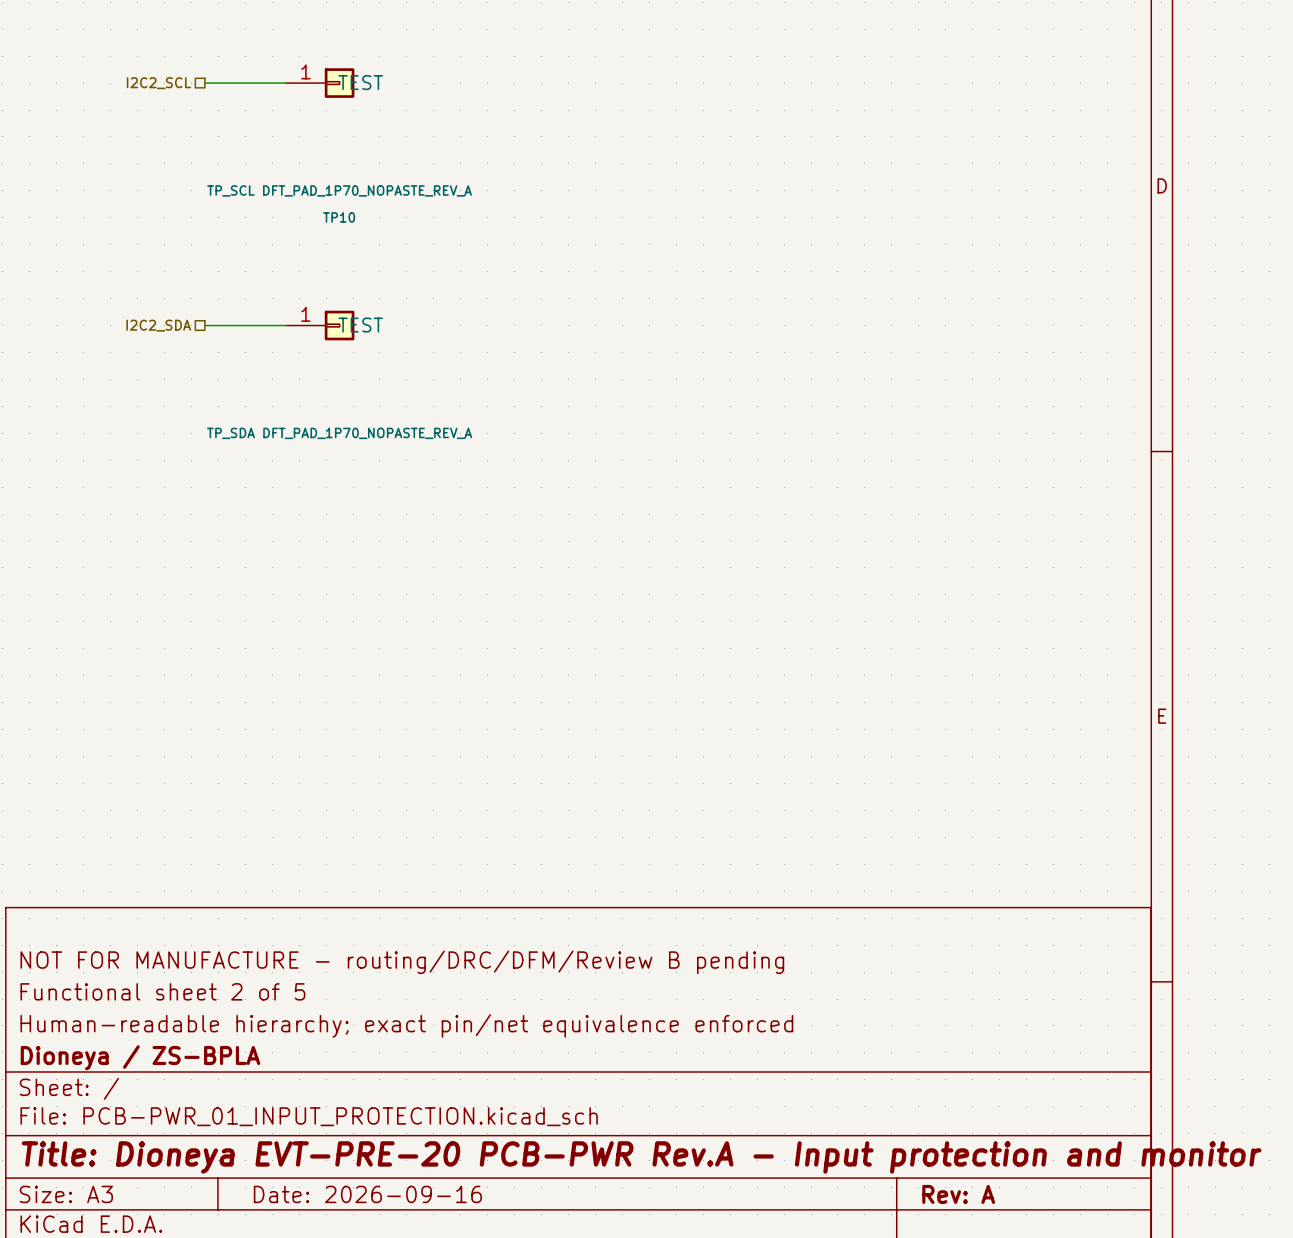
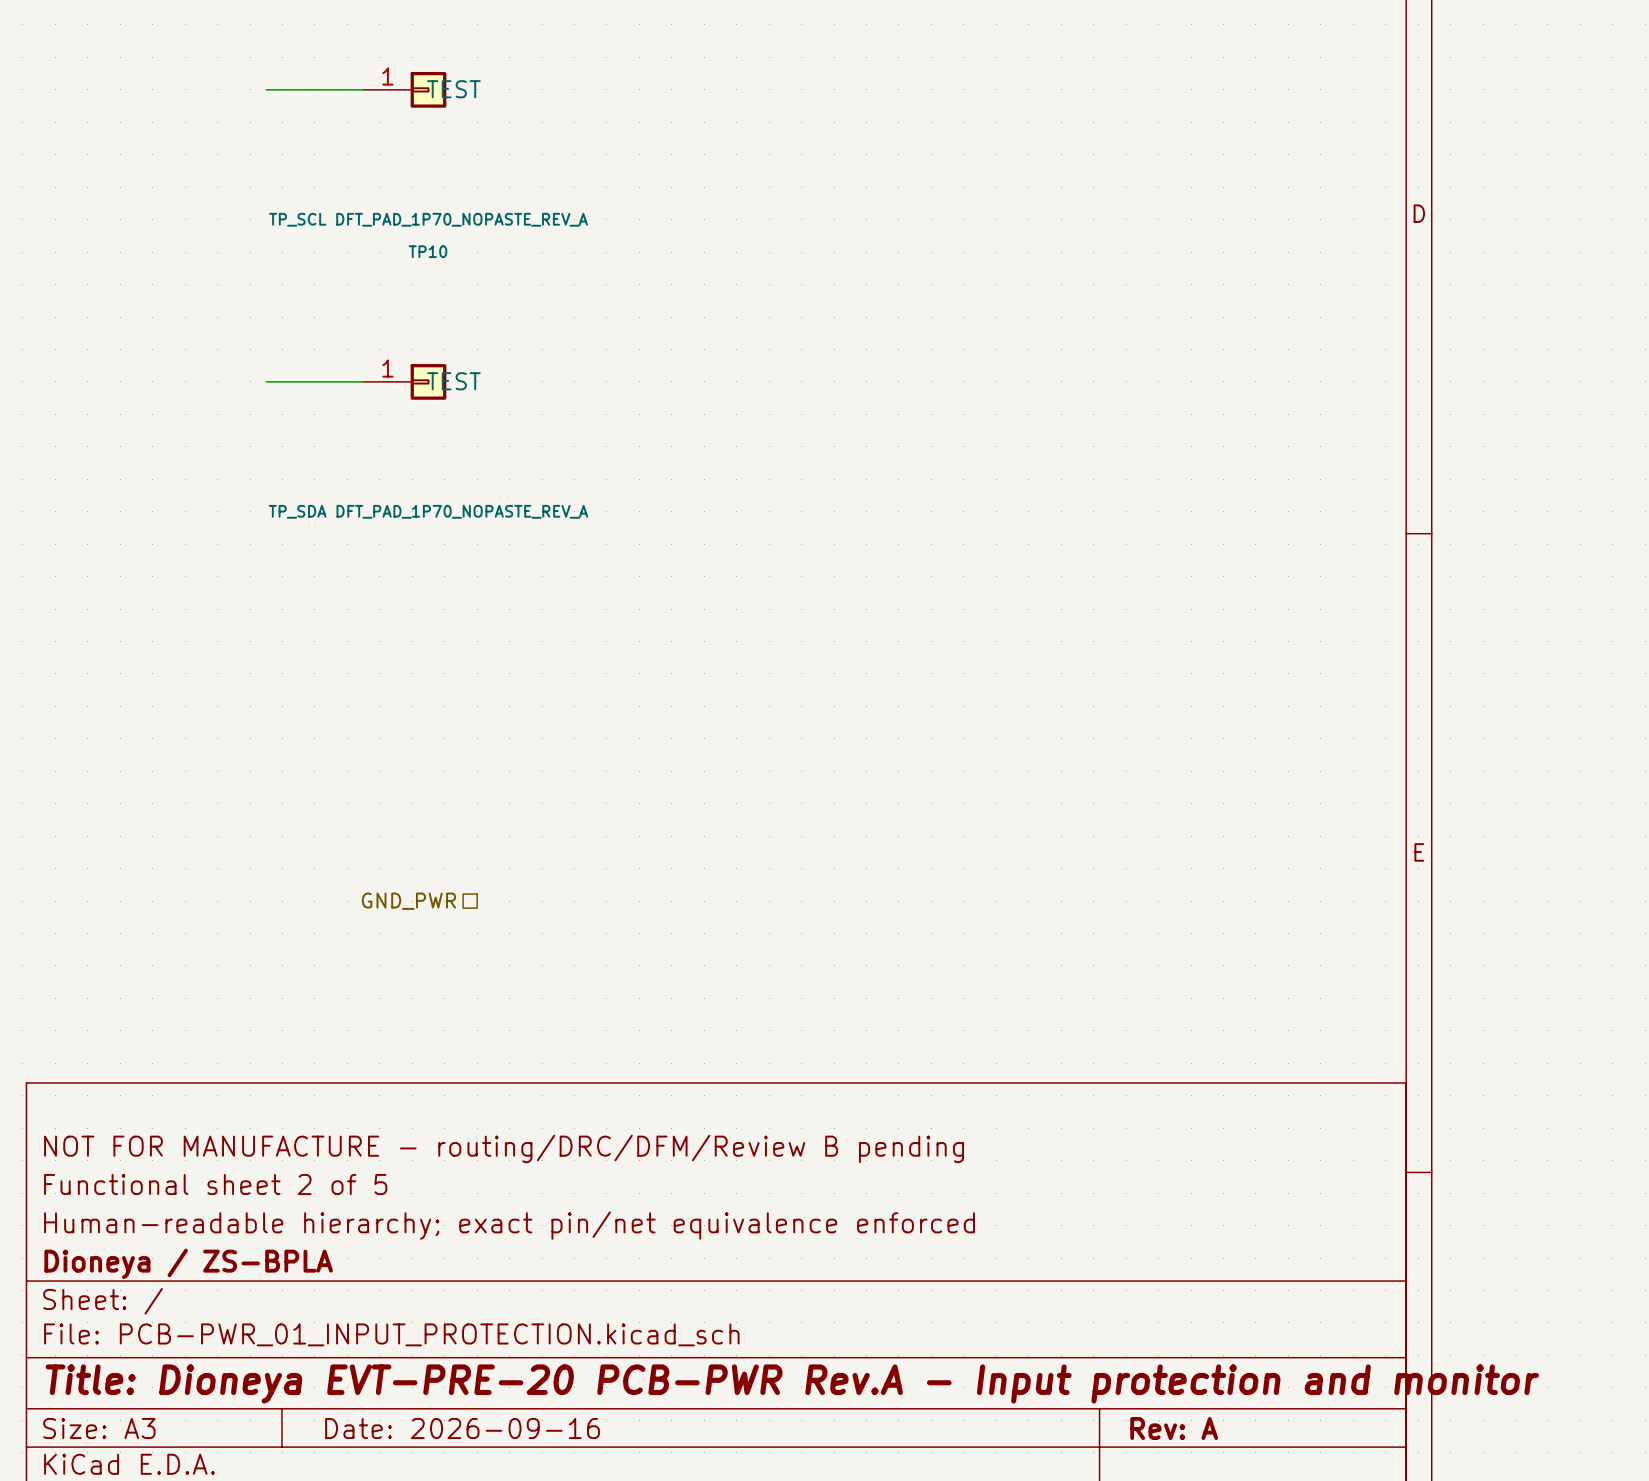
hierarchical label: I2C2_SCL (158, 83) -> none
hierarchical label: I2C2_SDA (158, 325) -> none
hierarchical label: none -> GND_PWR (408, 901)

